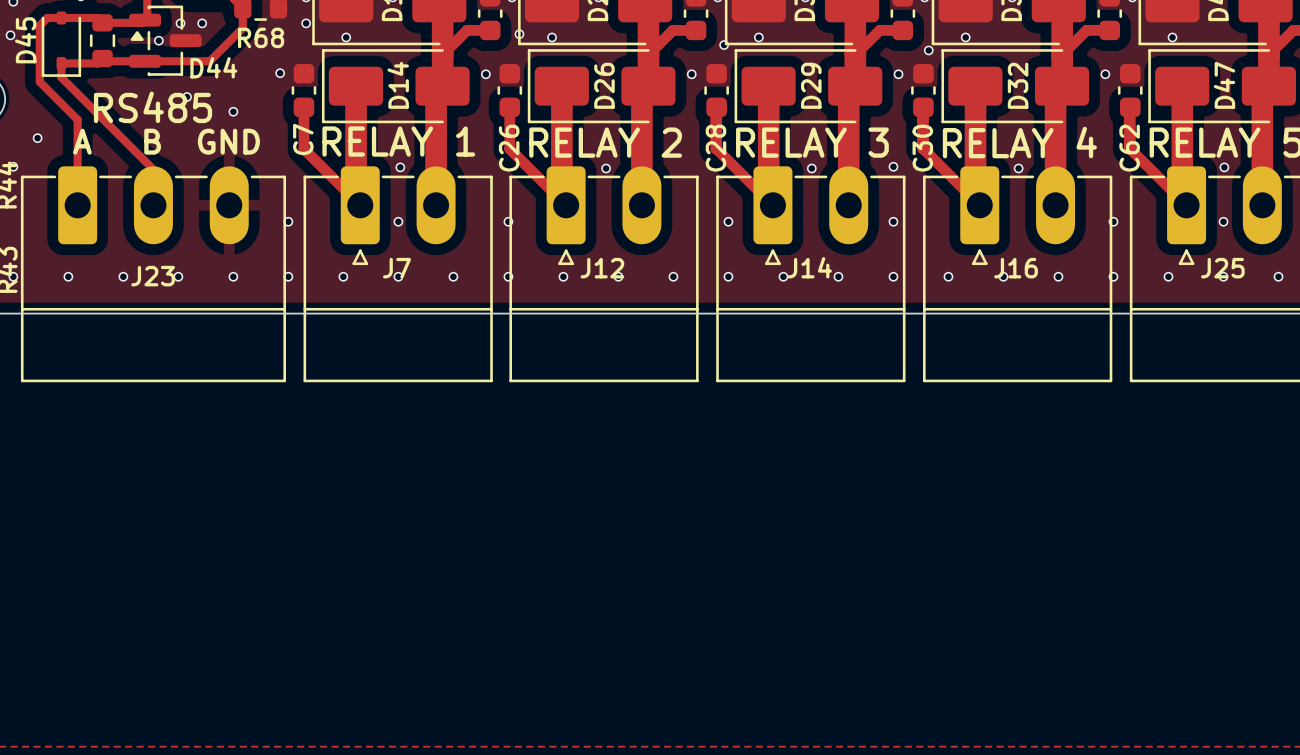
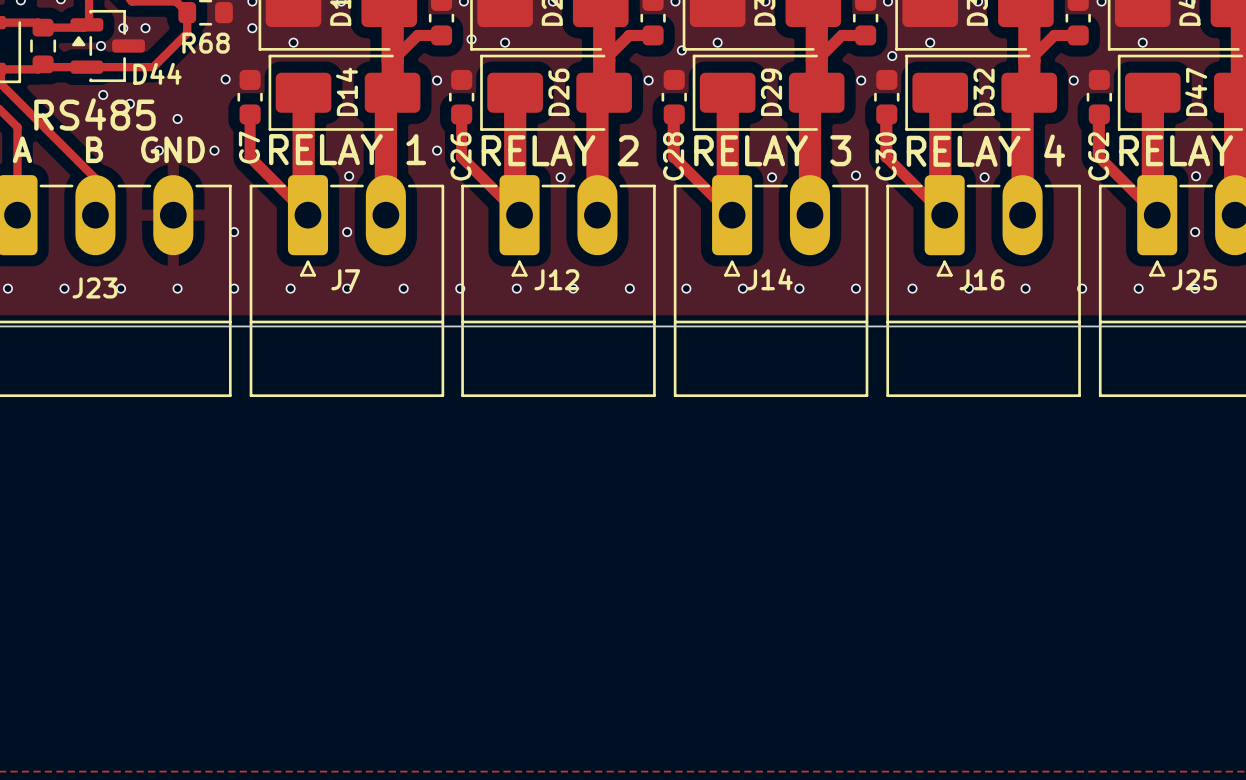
via: none -> (103, 94)
via: none -> (158, 150)
via: none -> (214, 150)
via position: (508, 221) -> (437, 150)
via: (728, 221) -> none
via: (893, 221) -> none
via: (1113, 221) -> none

